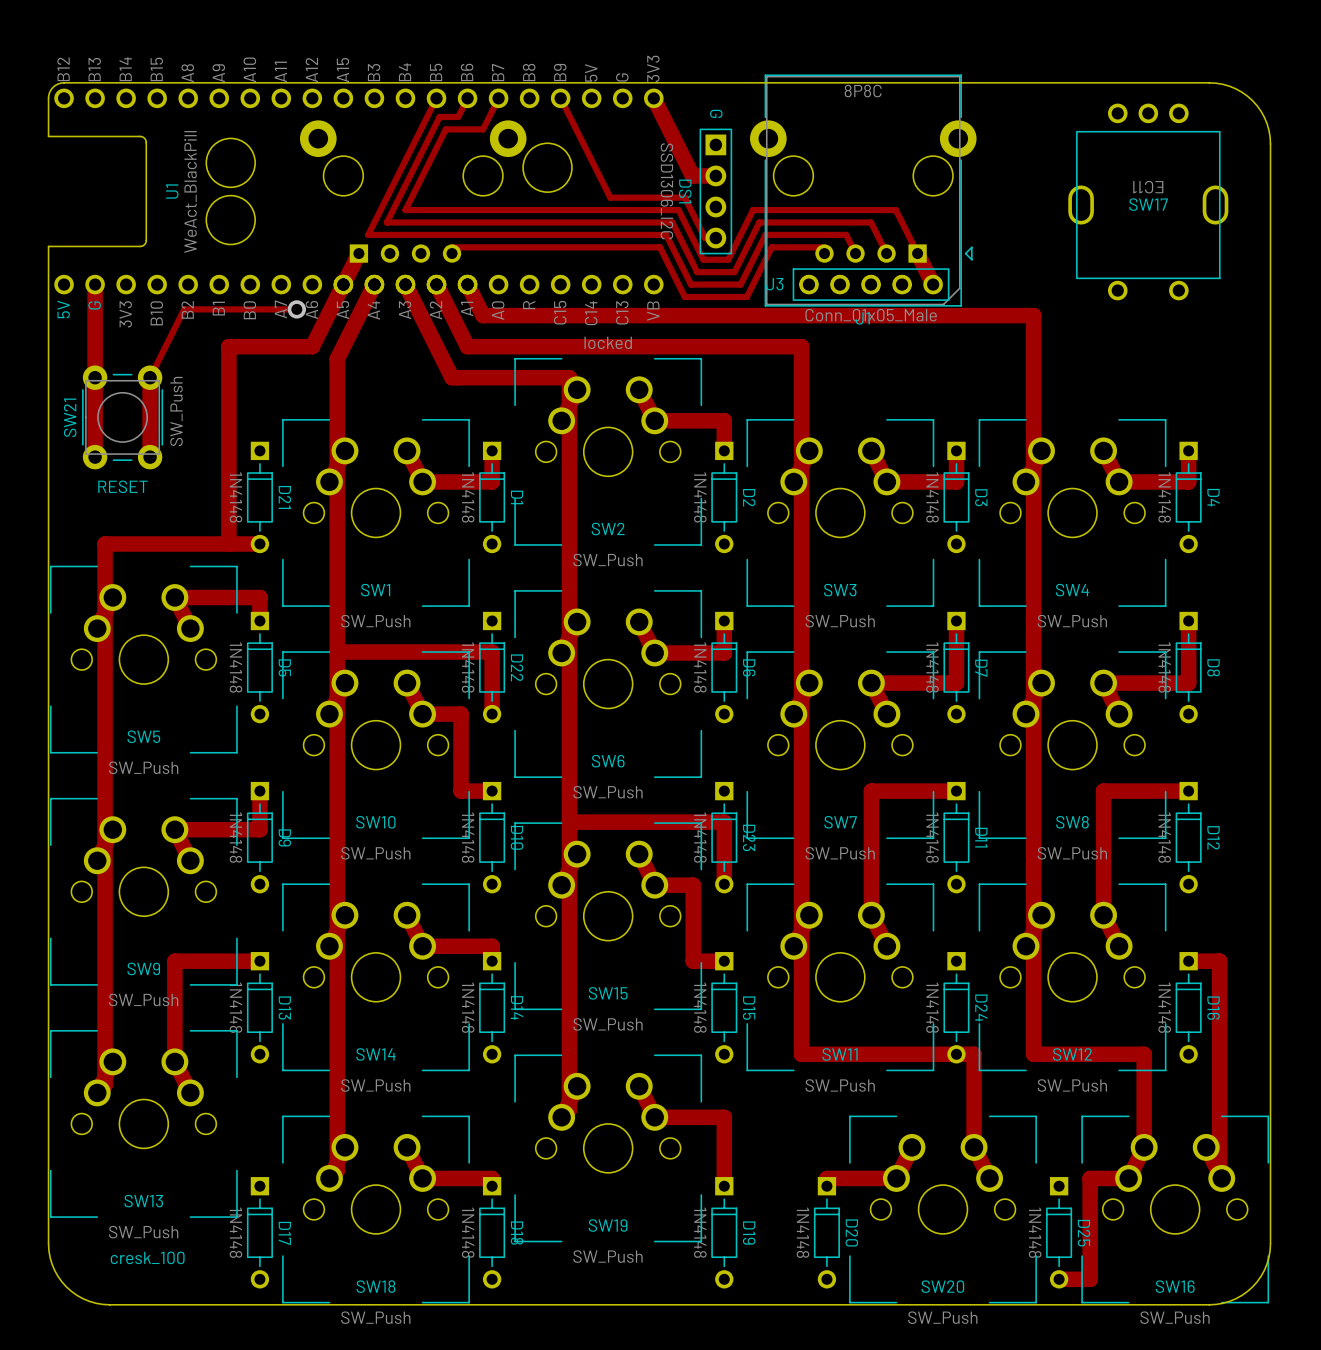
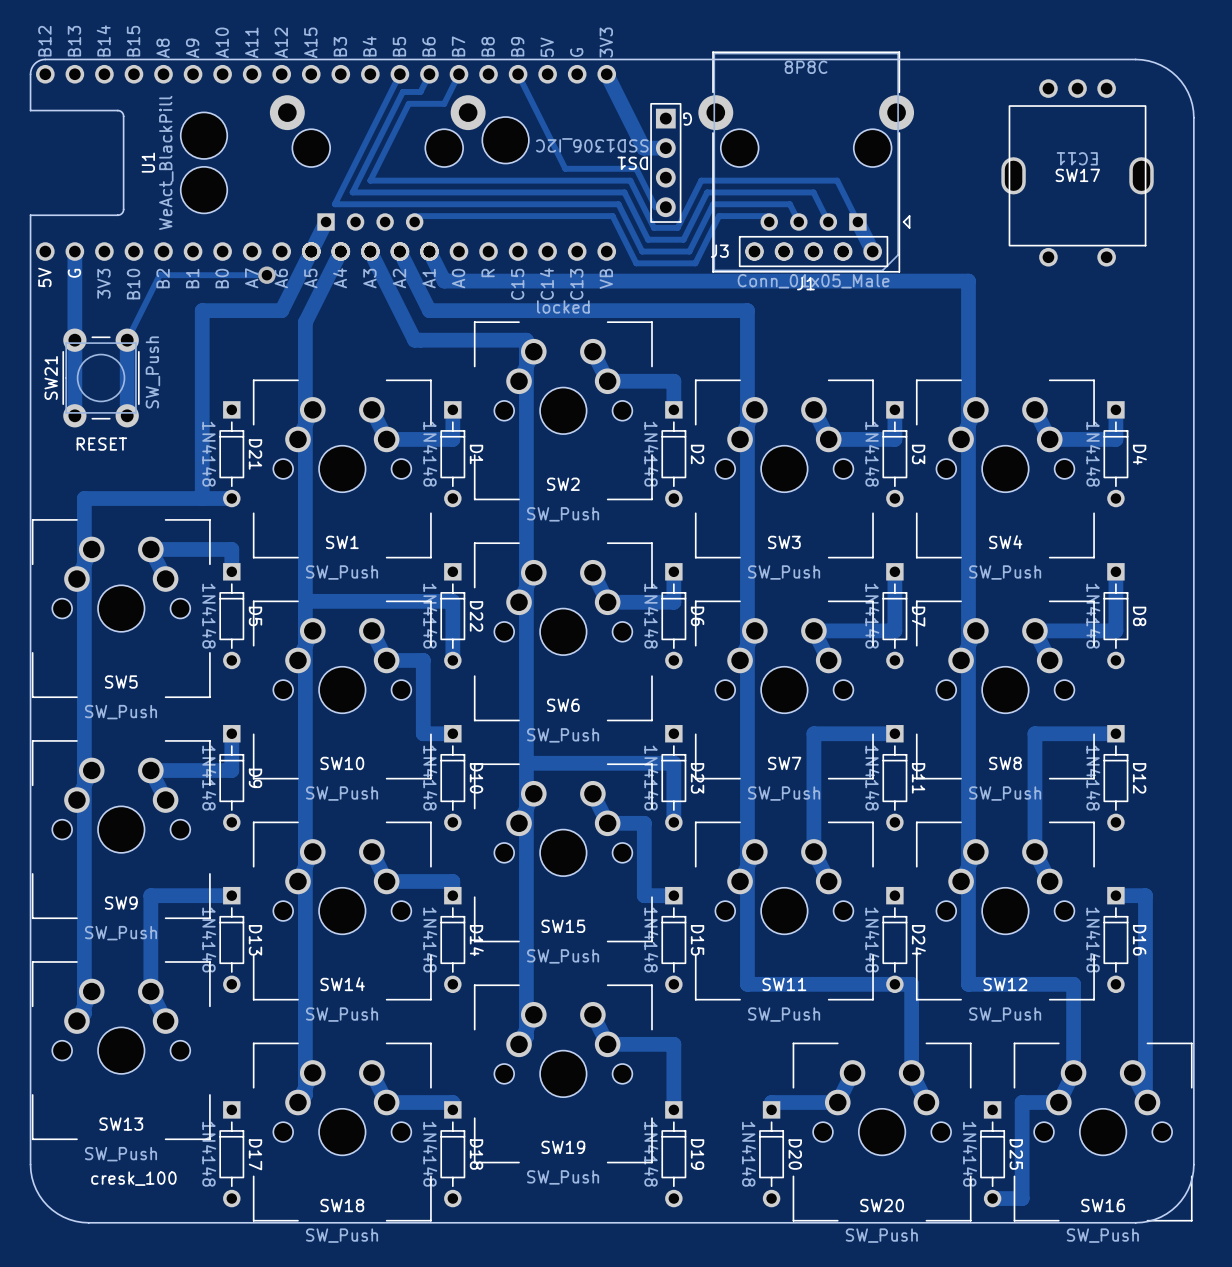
DS1 text rotation: 0° (716, 113) -> 90° clockwise (687, 119)
DS1 text position: G (716, 113) -> G (687, 119)
DS1 value rotation: 0° (666, 191) -> 90° clockwise (592, 145)
DS1 name rotation: 0° (685, 191) -> 90° clockwise (632, 163)

